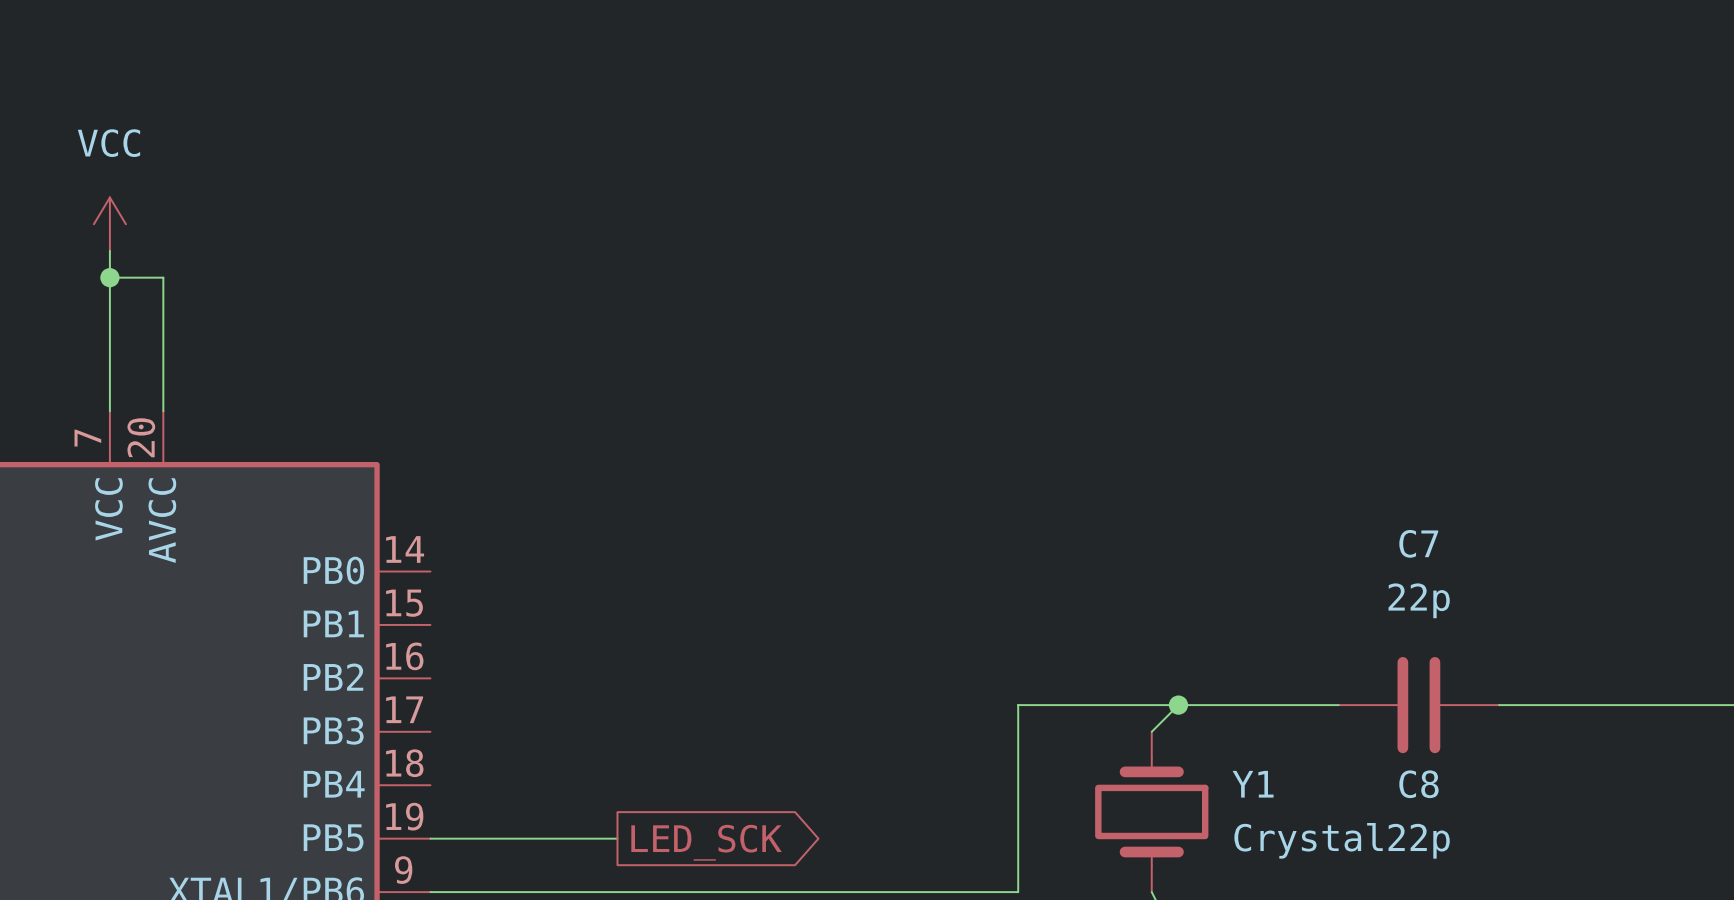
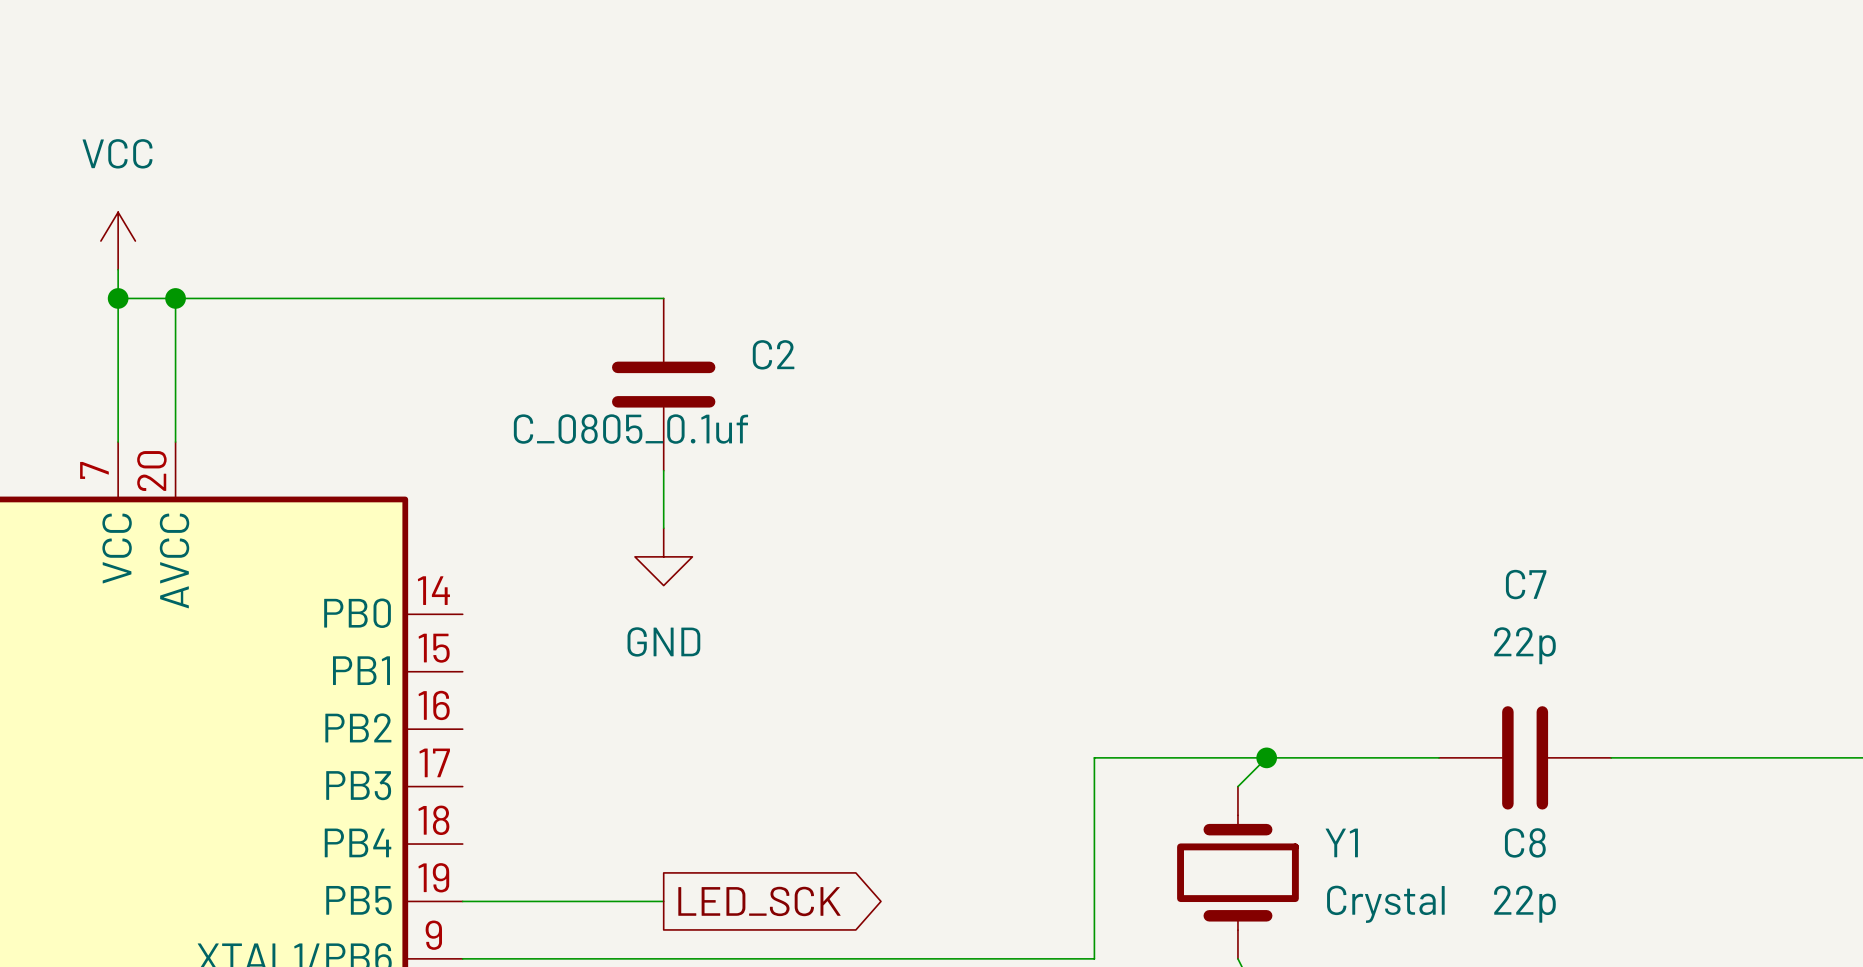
wire: none -> (175, 298) (663, 298)
junction: none -> (175, 298)
C2: none -> C_0805_0.1uf (663, 384)
wire: none -> (663, 470) (663, 528)
power symbol: none -> GND (663, 556)

